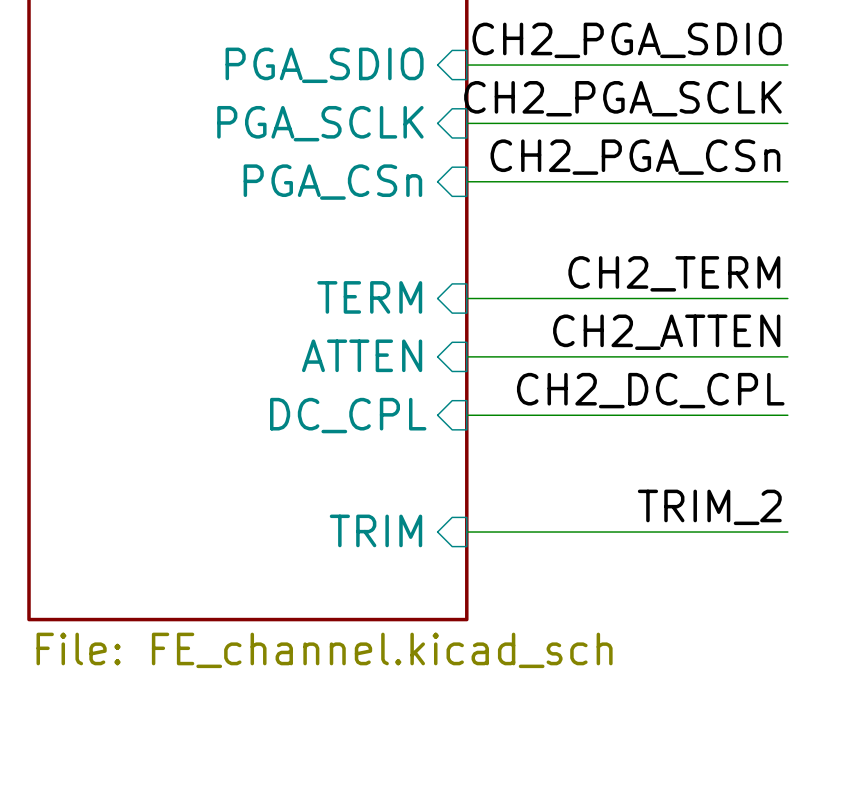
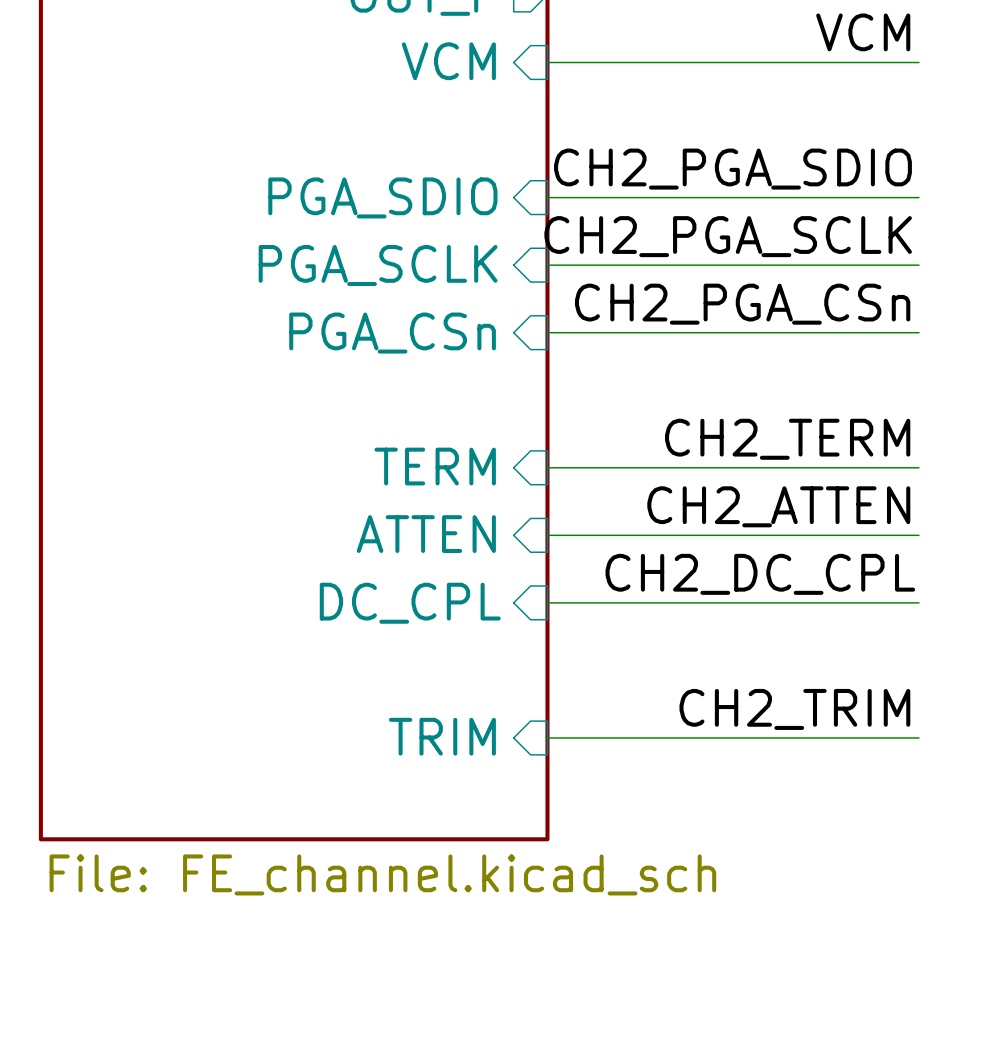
label: TRIM_2 (709, 507) -> CH2_TRIM (794, 709)

